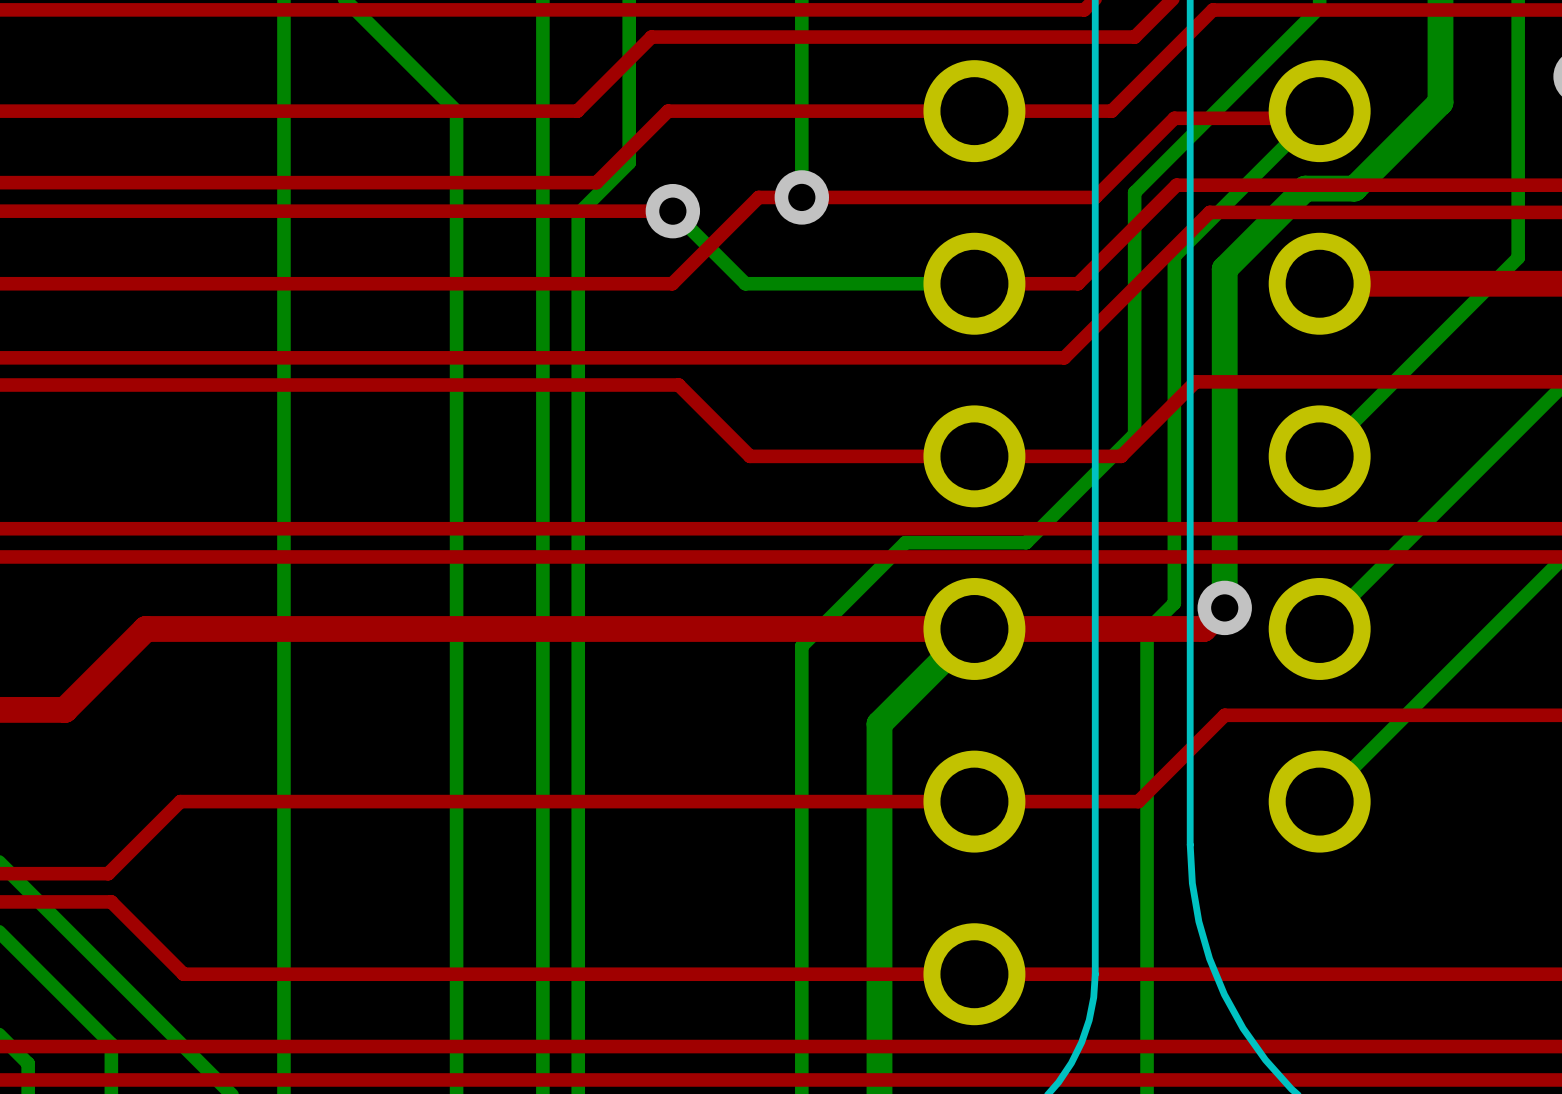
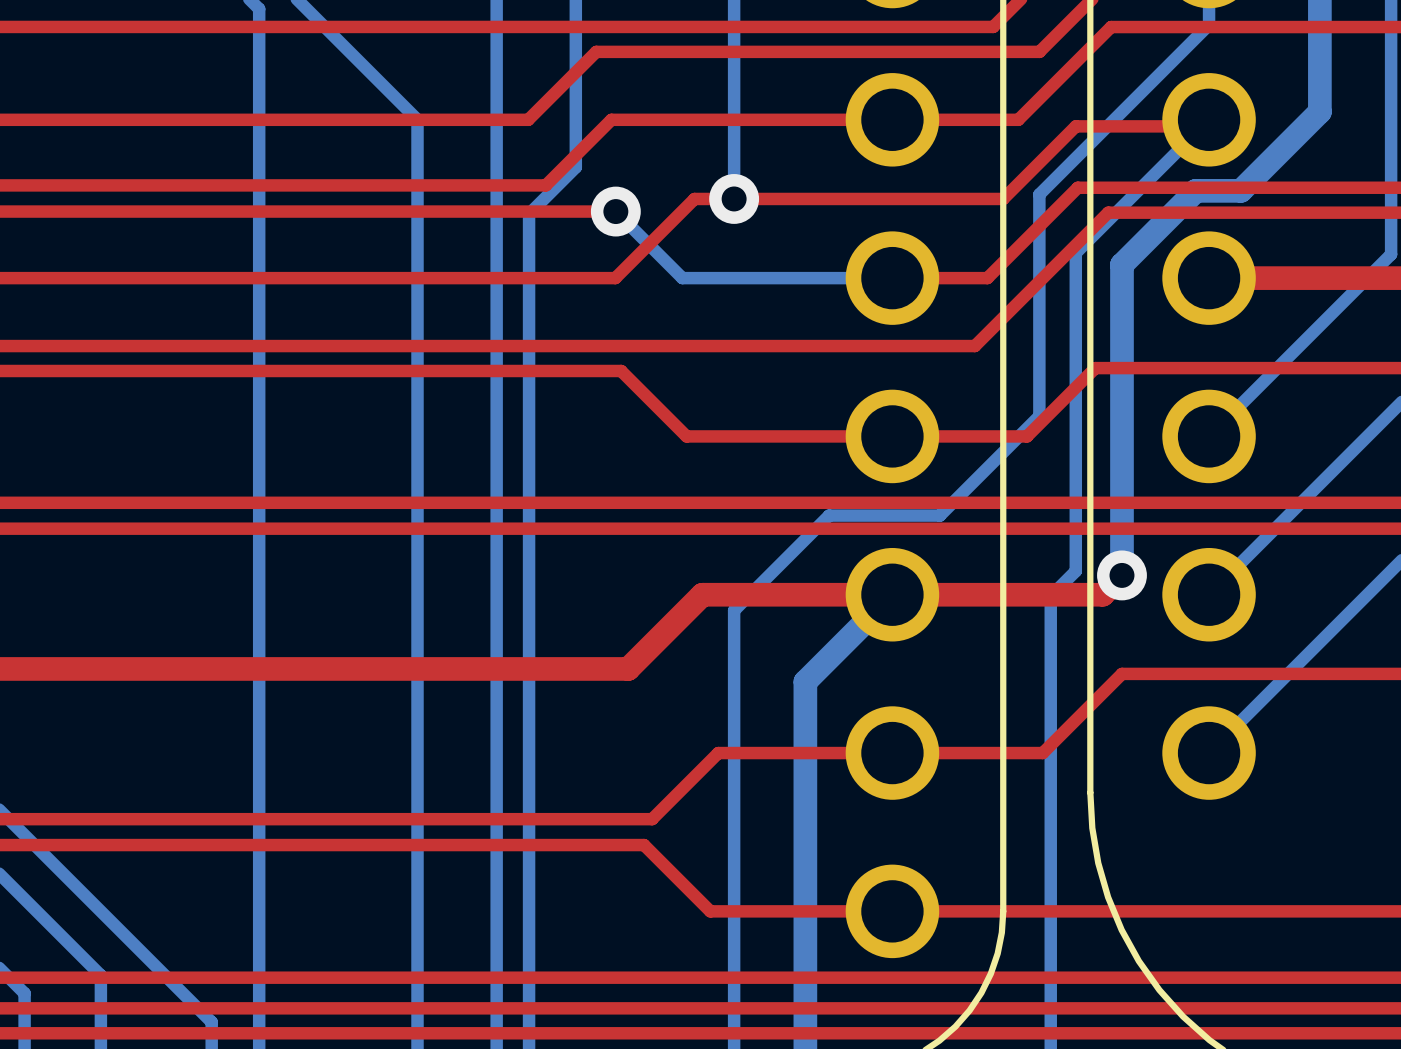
top track: (767, 628) (145, 628) (64, 709) -> (702, 594) (628, 668) (58, 668)
top track: (784, 801) (180, 801) (108, 873) -> (718, 753) (652, 819) (98, 819)
top track: (111, 901) (183, 974) (775, 974) -> (100, 845) (644, 845) (710, 911)

